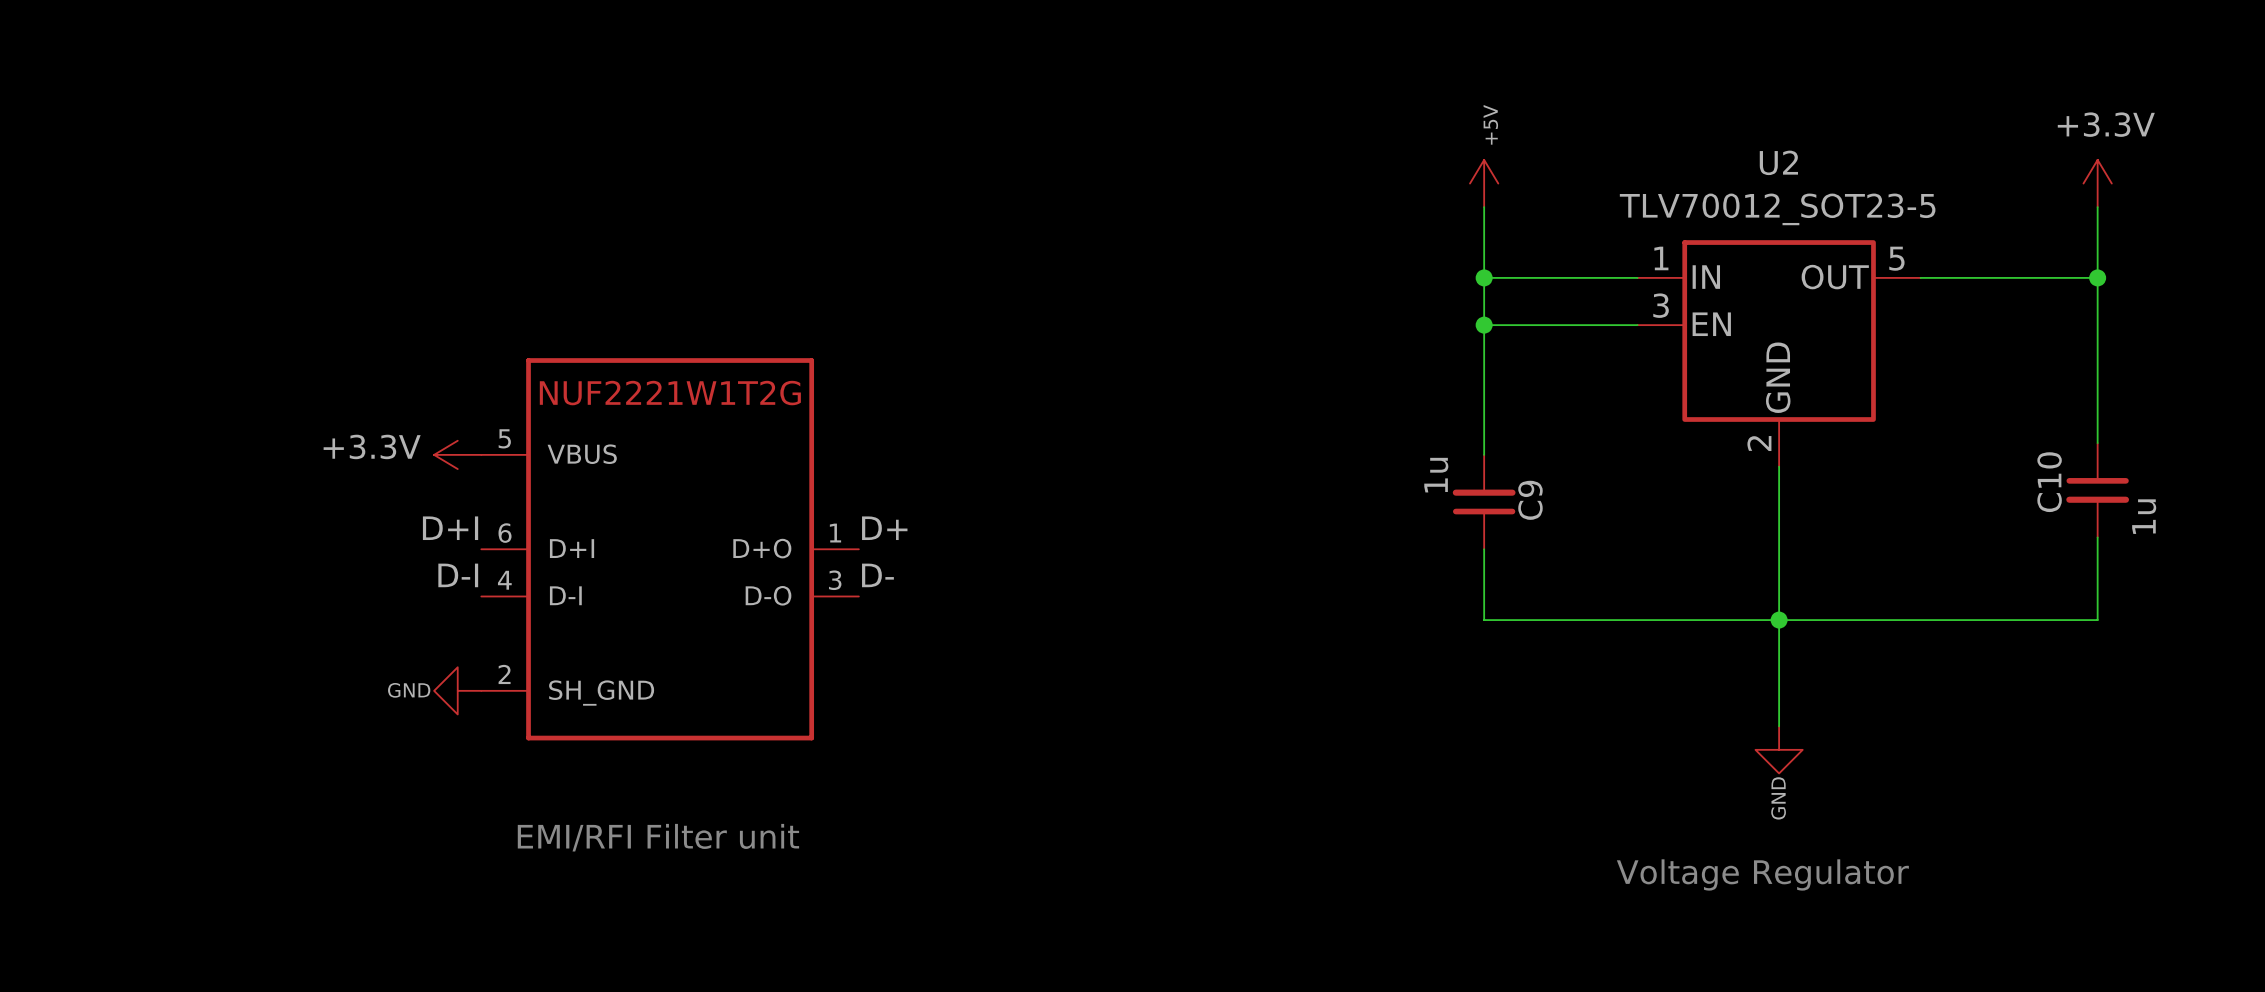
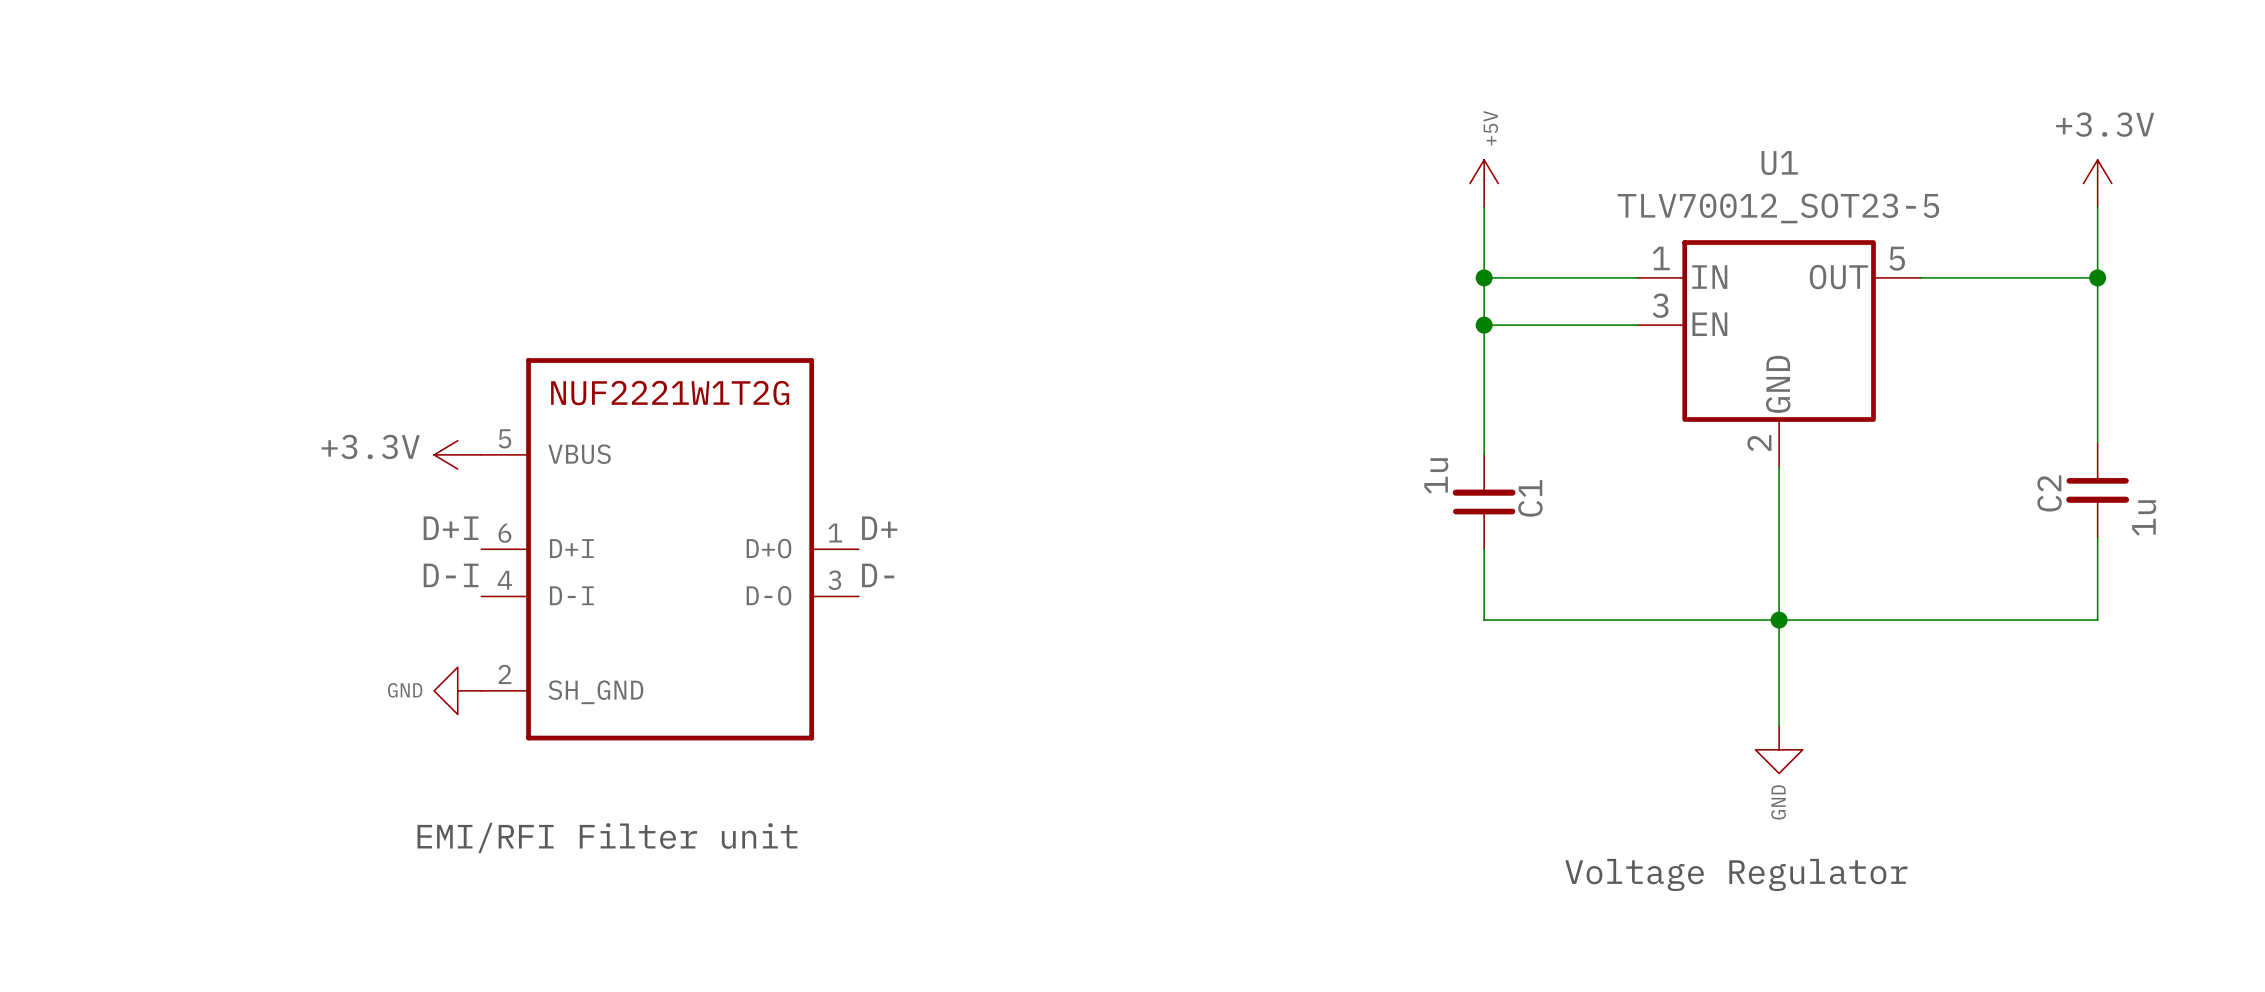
U2 name: U2 (1778, 162) -> U1 (1779, 163)
C10 name: C10 (2049, 482) -> C2 (2049, 493)
C9 name: C9 (1530, 500) -> C1 (1530, 498)

